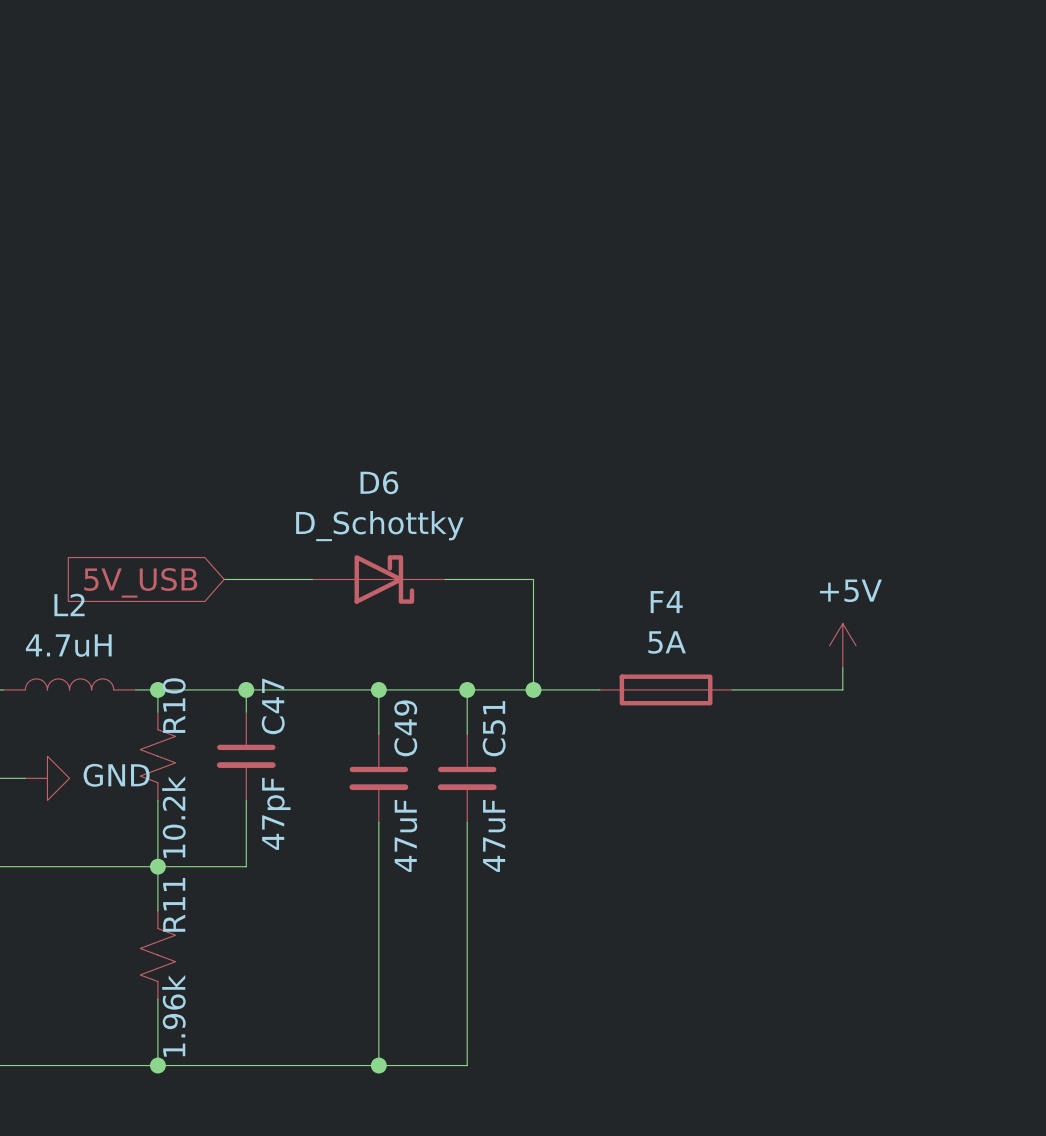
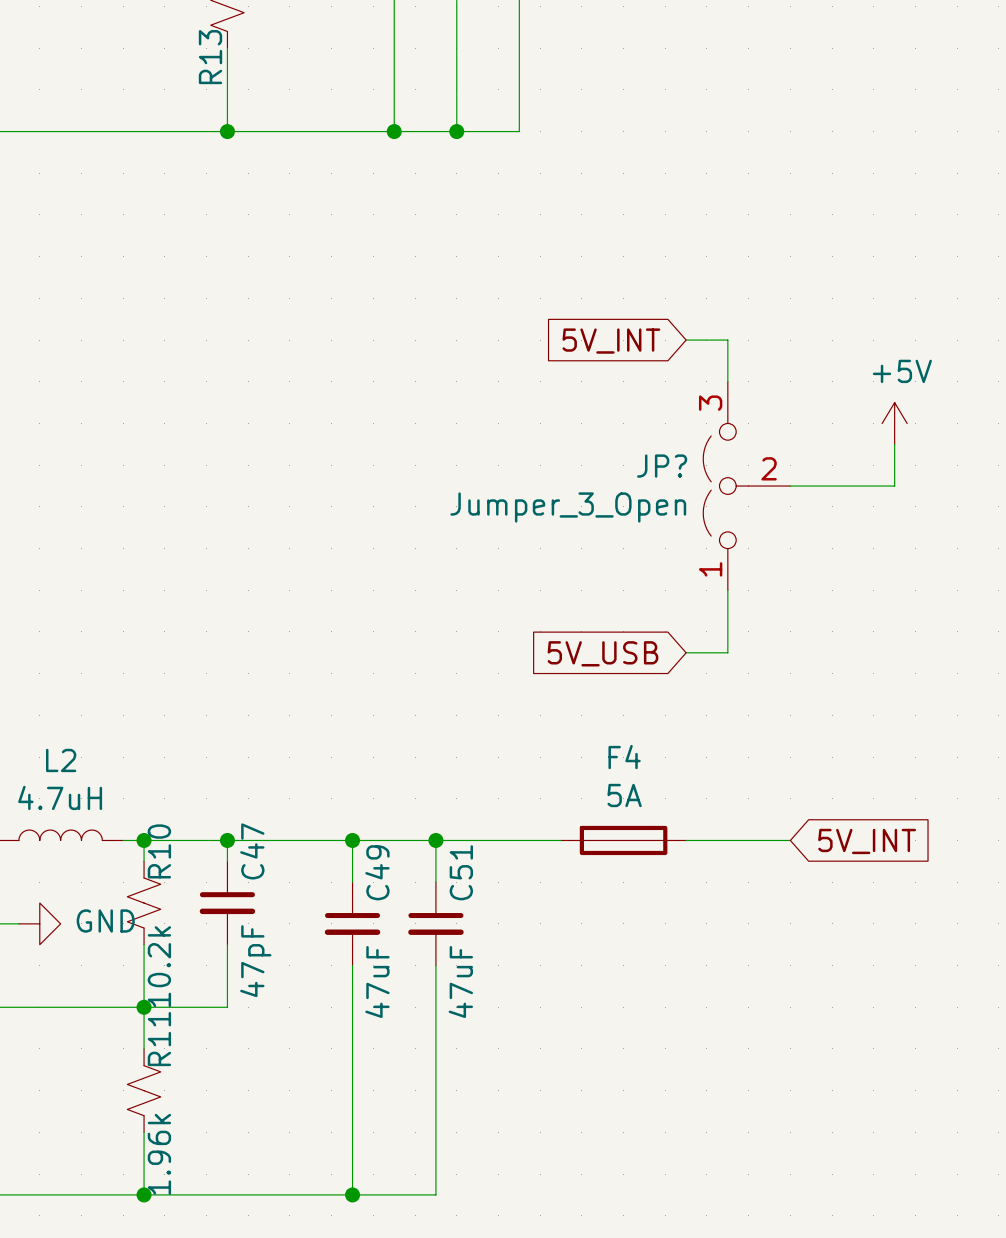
wire: none -> (686, 340) (727, 340) (727, 381)
global label: none -> 5V_INT (611, 341)
wire: none -> (894, 444) (894, 486) (790, 486)
JP?: none -> Jumper_3_Open (746, 486)
wire: none -> (727, 590) (727, 652) (686, 652)
global label: none -> 5V_USB (602, 653)
wire: (224, 579) (312, 579) -> none
D6: D_Schottky (378, 579) -> none
wire: (445, 579) (533, 579) (533, 689) -> none
global label: 5V_USB (140, 582) -> none
power symbol position: +5V (842, 645) -> +5V (894, 423)
wire: (842, 667) (842, 689) -> none
junction: (533, 689) -> none
global label: none -> 5V_INT (867, 841)

